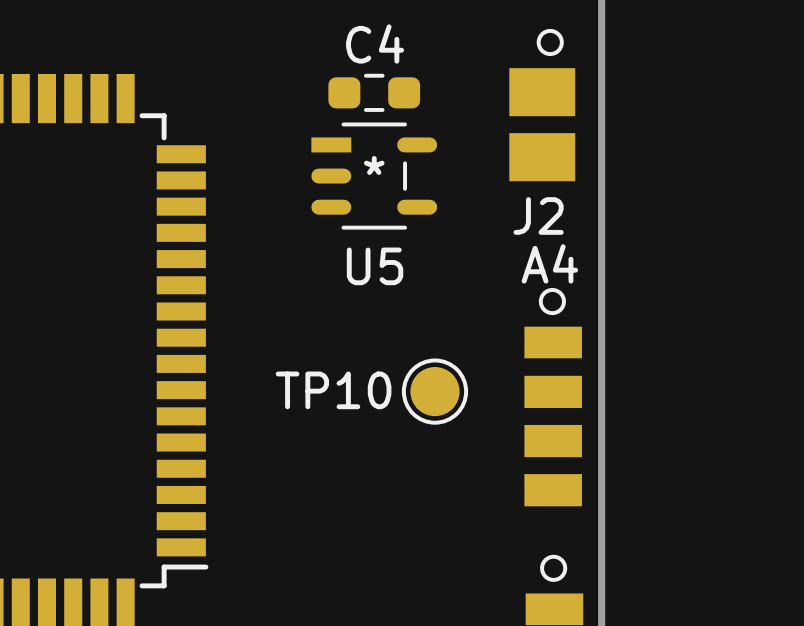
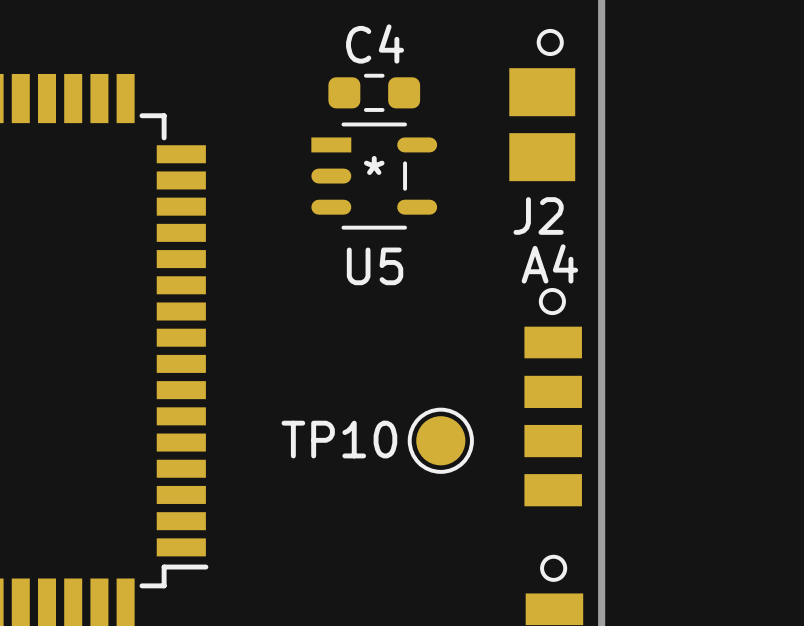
TP10 position: (434, 391) -> (440, 440)

